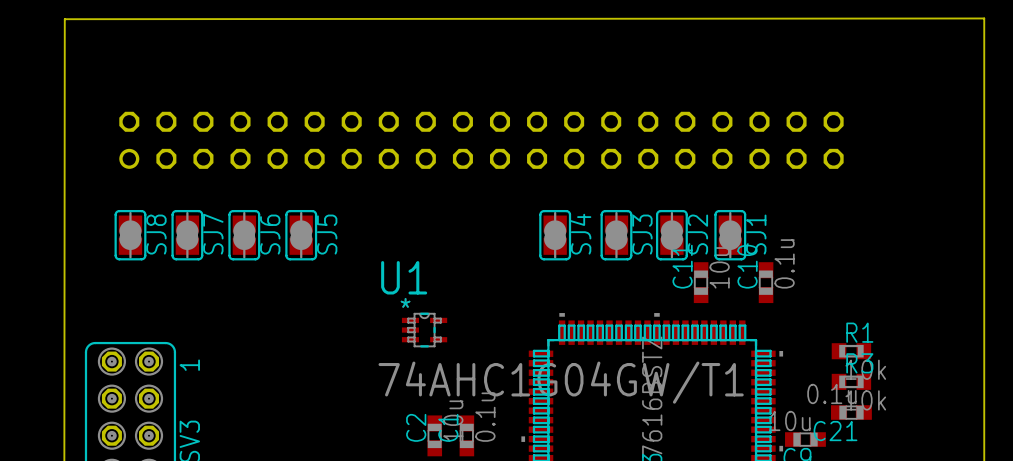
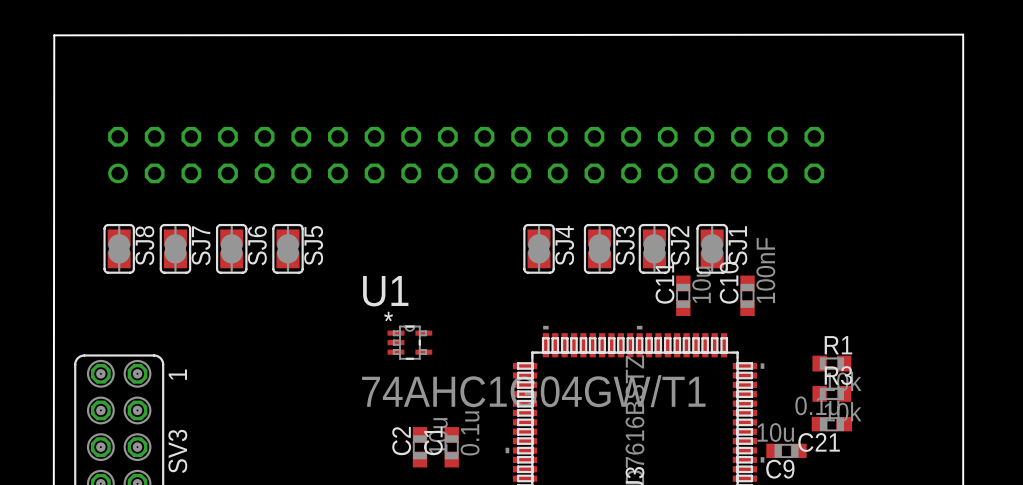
C10 value: 0.1u (784, 263) -> 100nF (765, 270)

